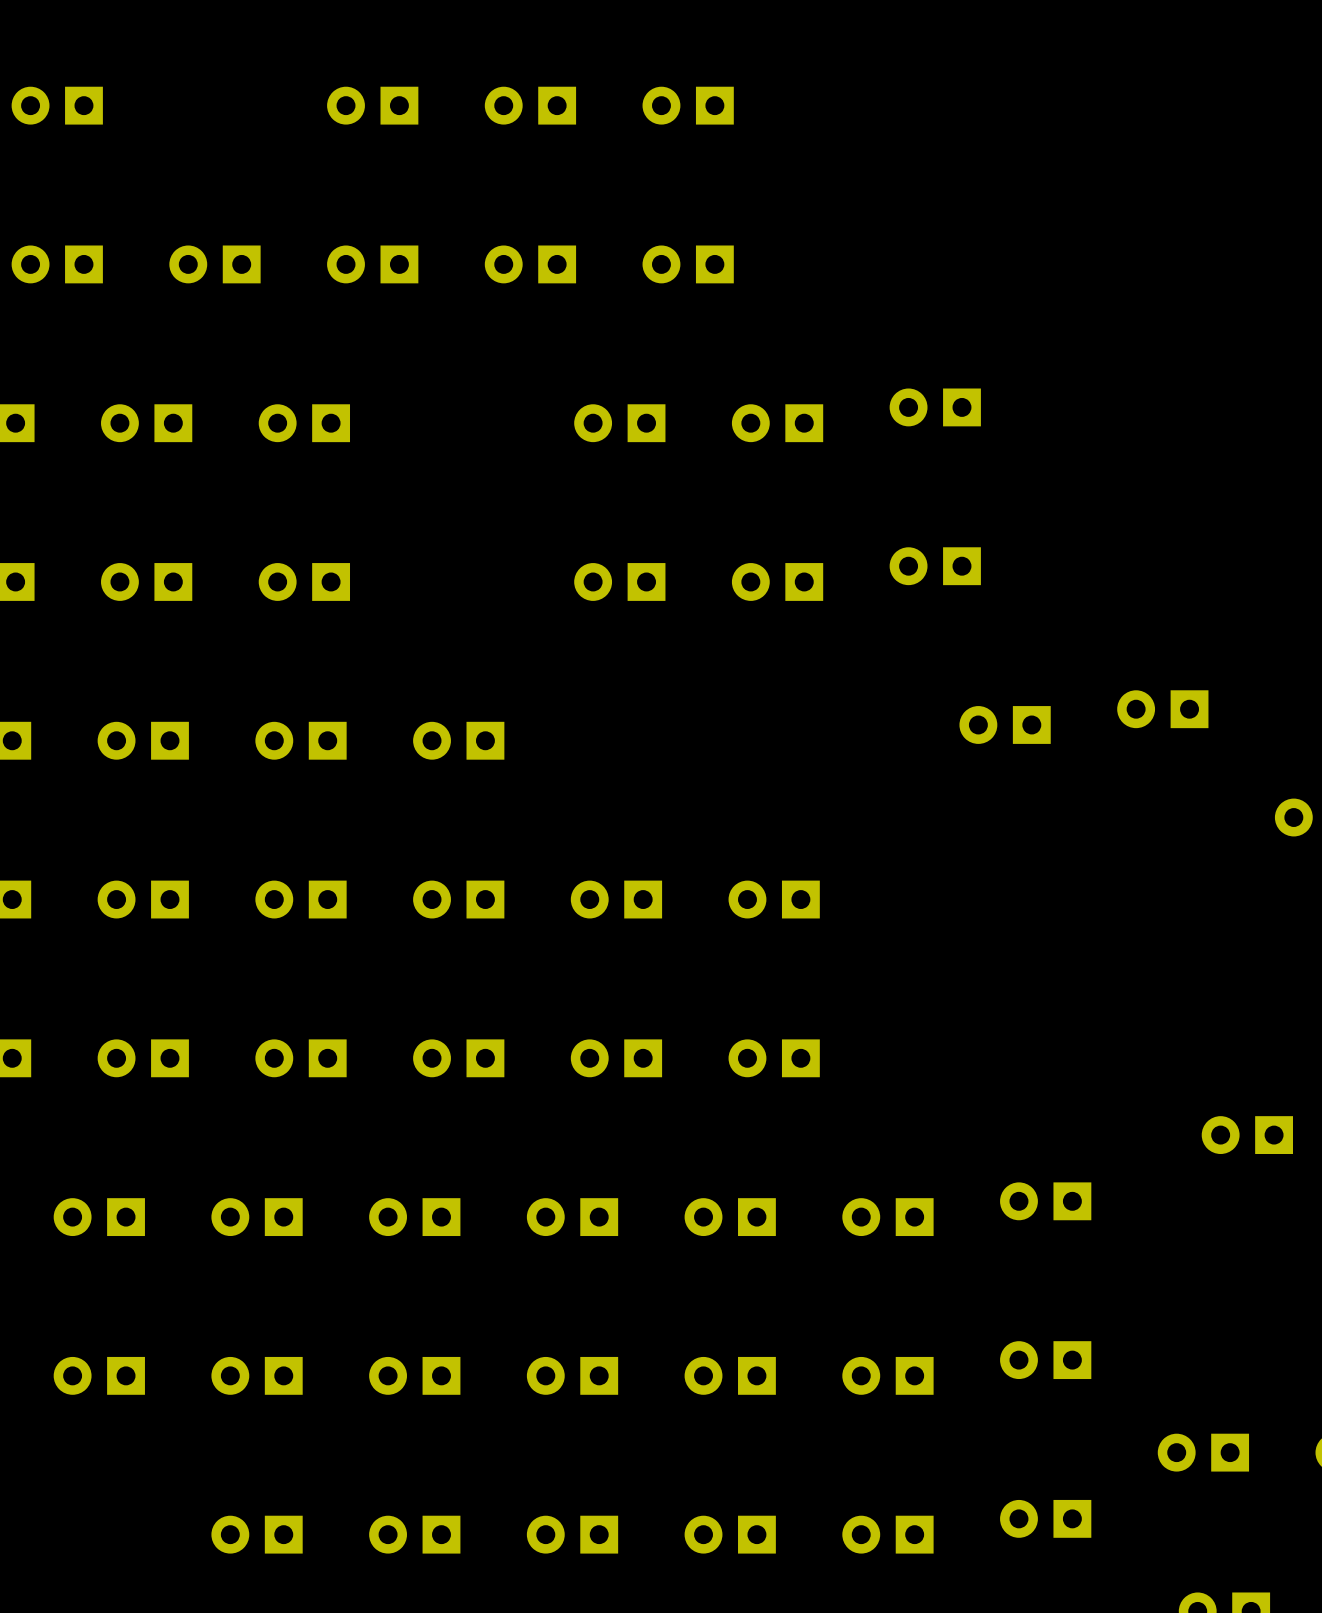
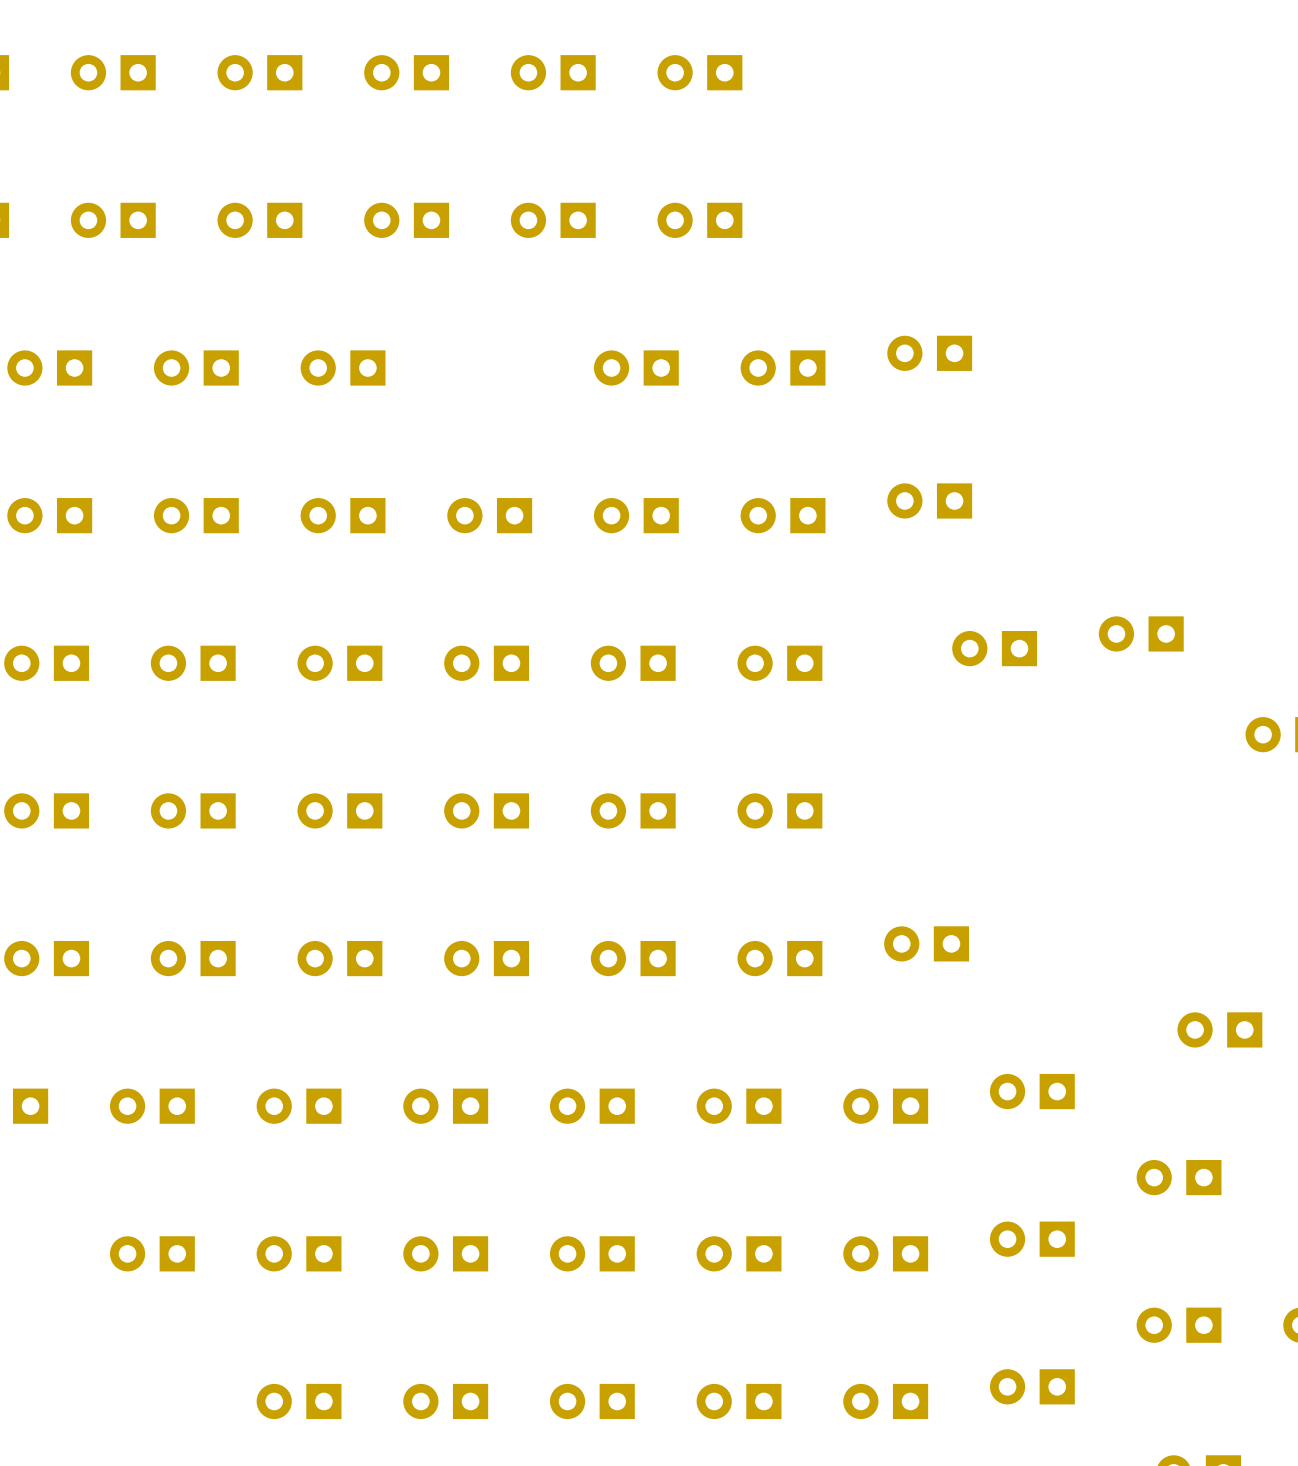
part: none -> (259, 72)
part: none -> (489, 515)
part: none -> (633, 663)
part: none -> (779, 663)
part: none -> (926, 943)
part: none -> (1179, 1177)

